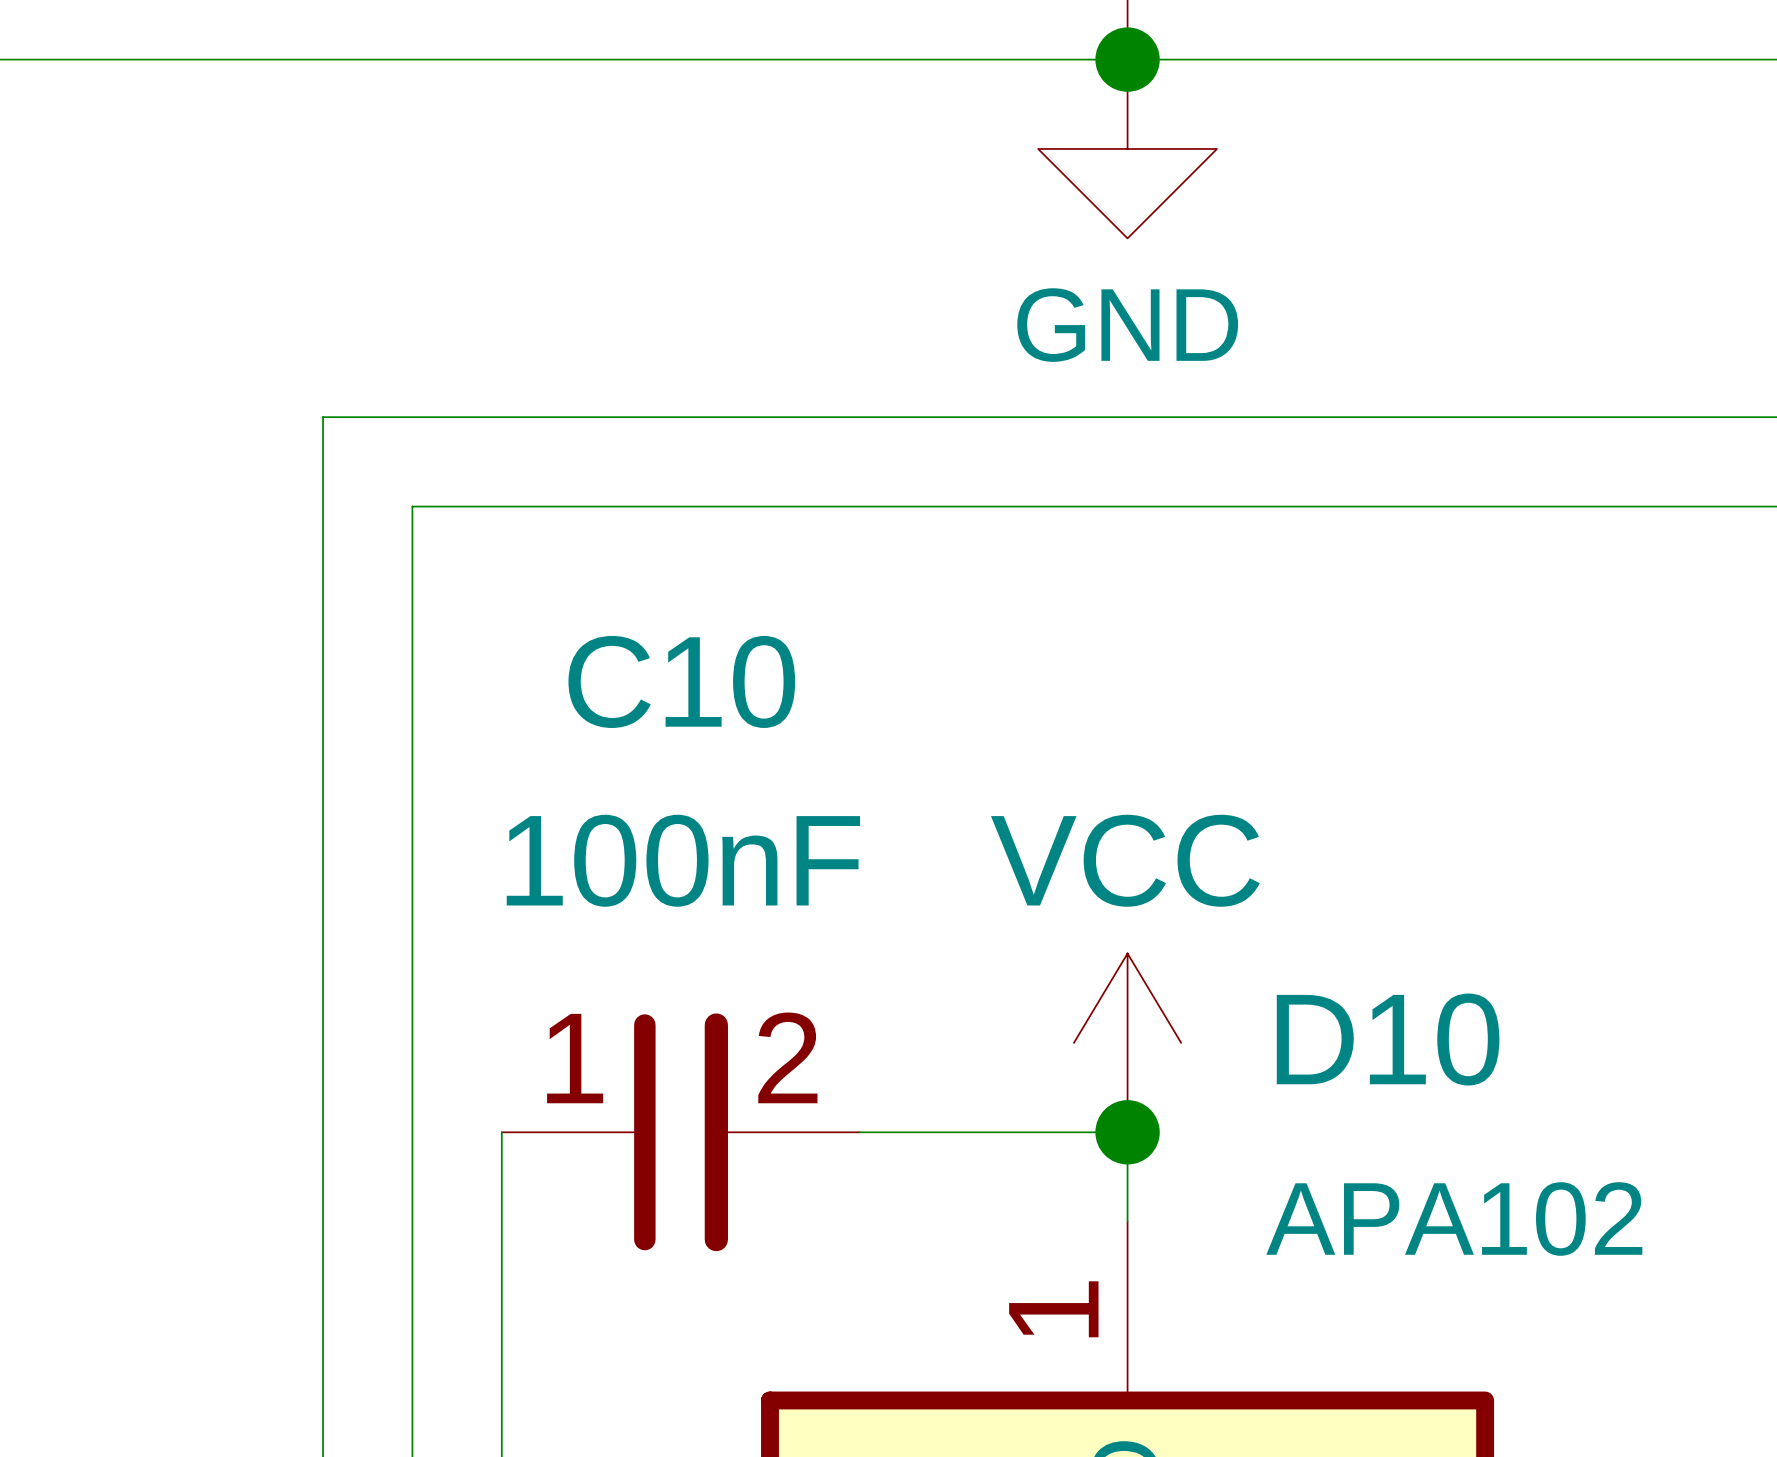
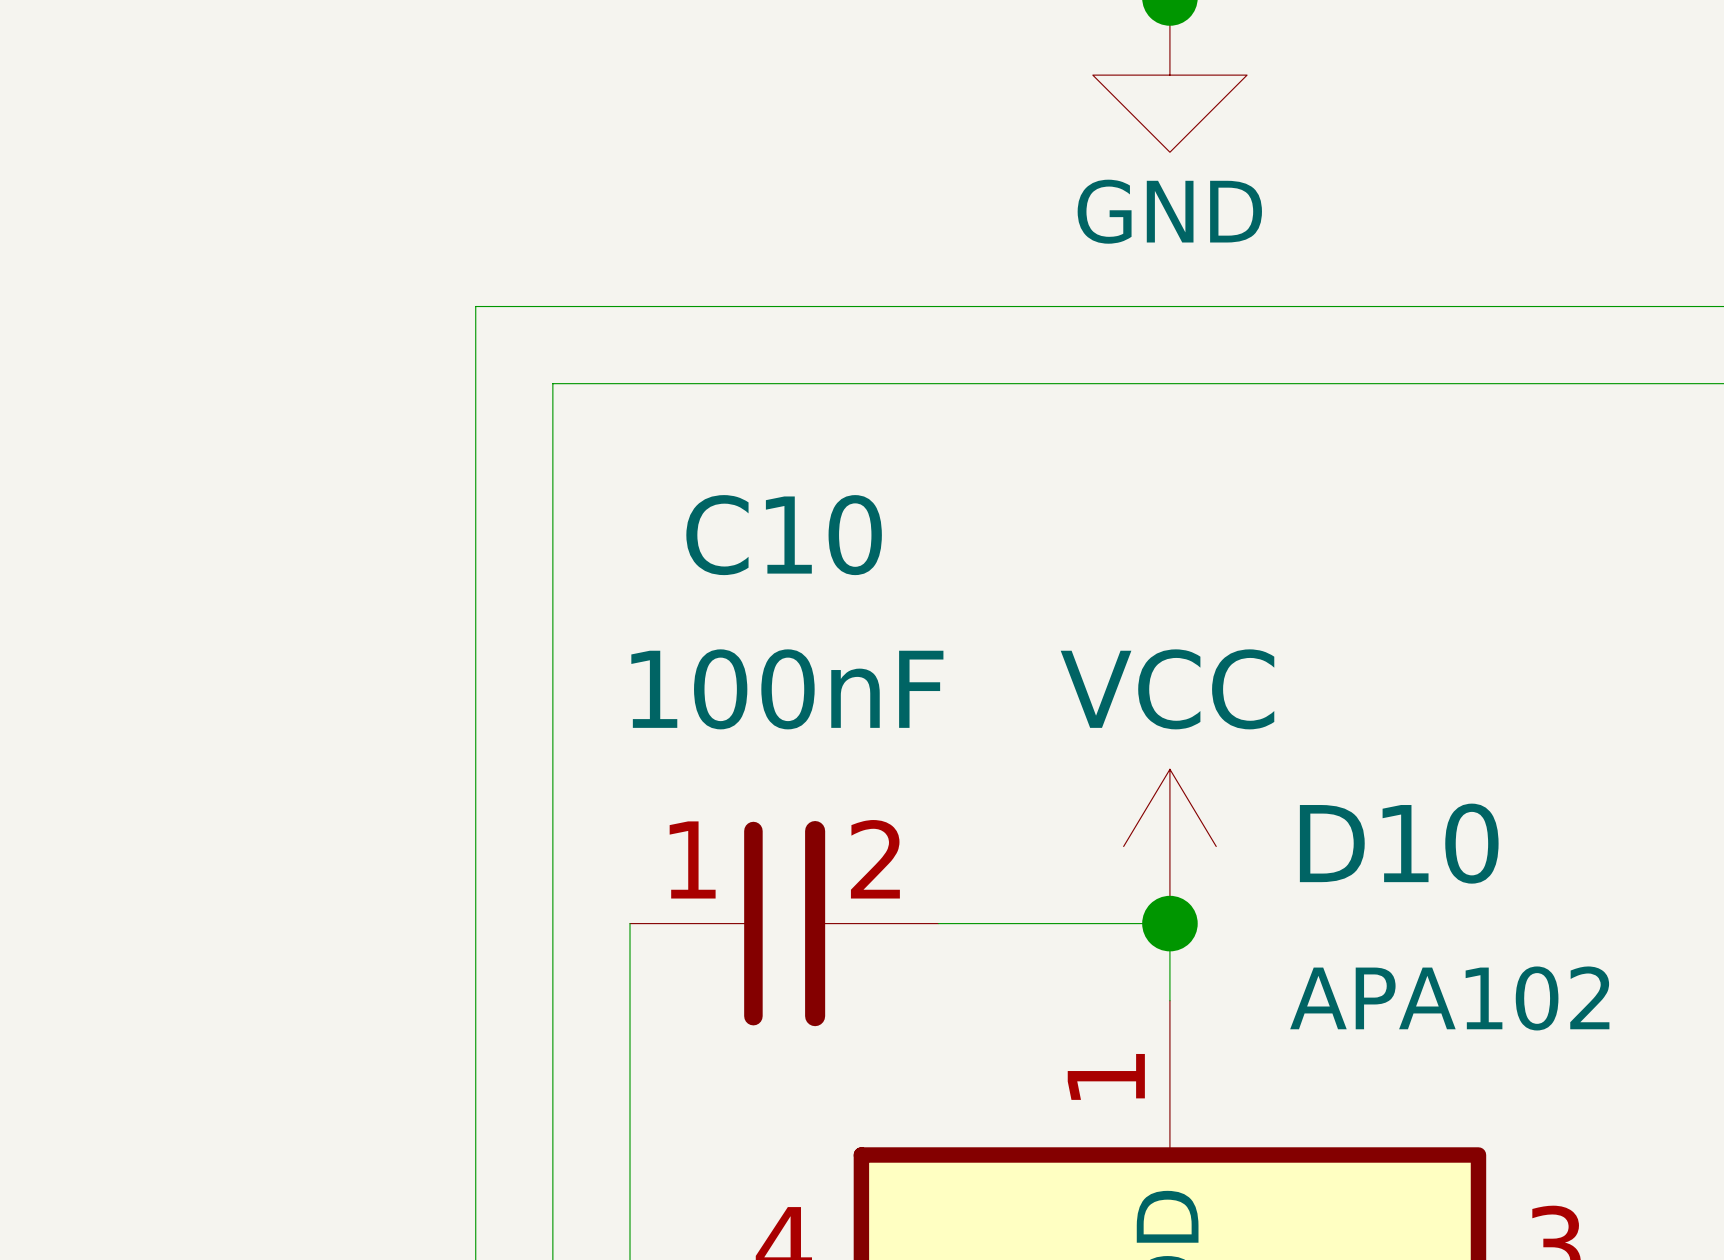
power symbol text position: GND (1127, 325) -> GND (1169, 211)

